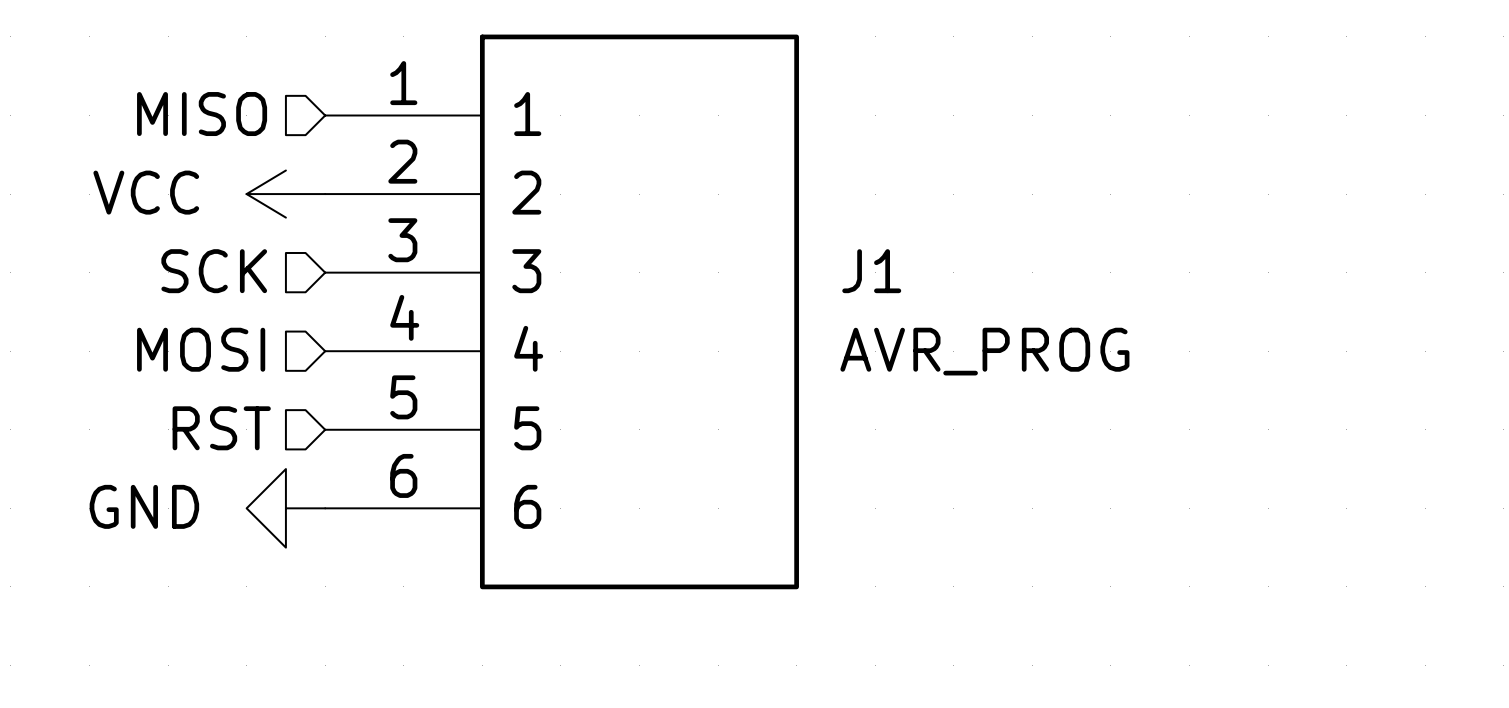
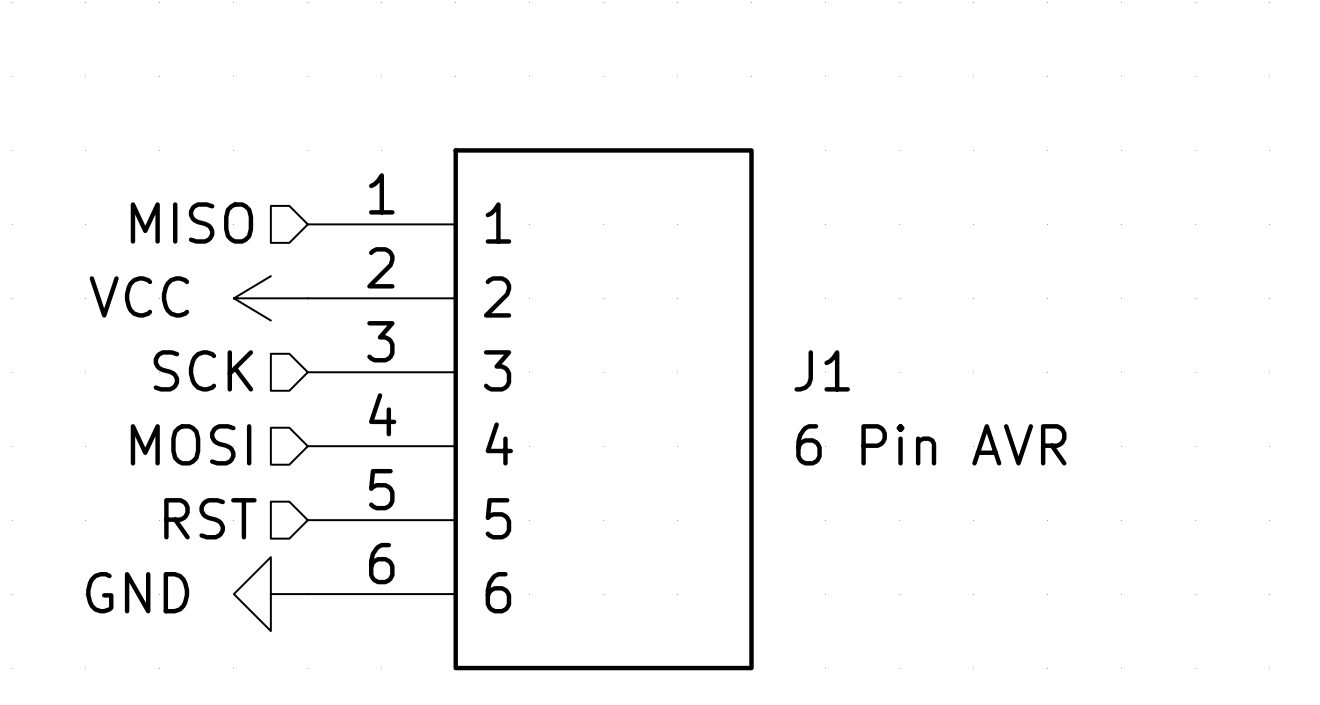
J1 value: AVR_PROG (984, 351) -> 6 Pin AVR (931, 444)

